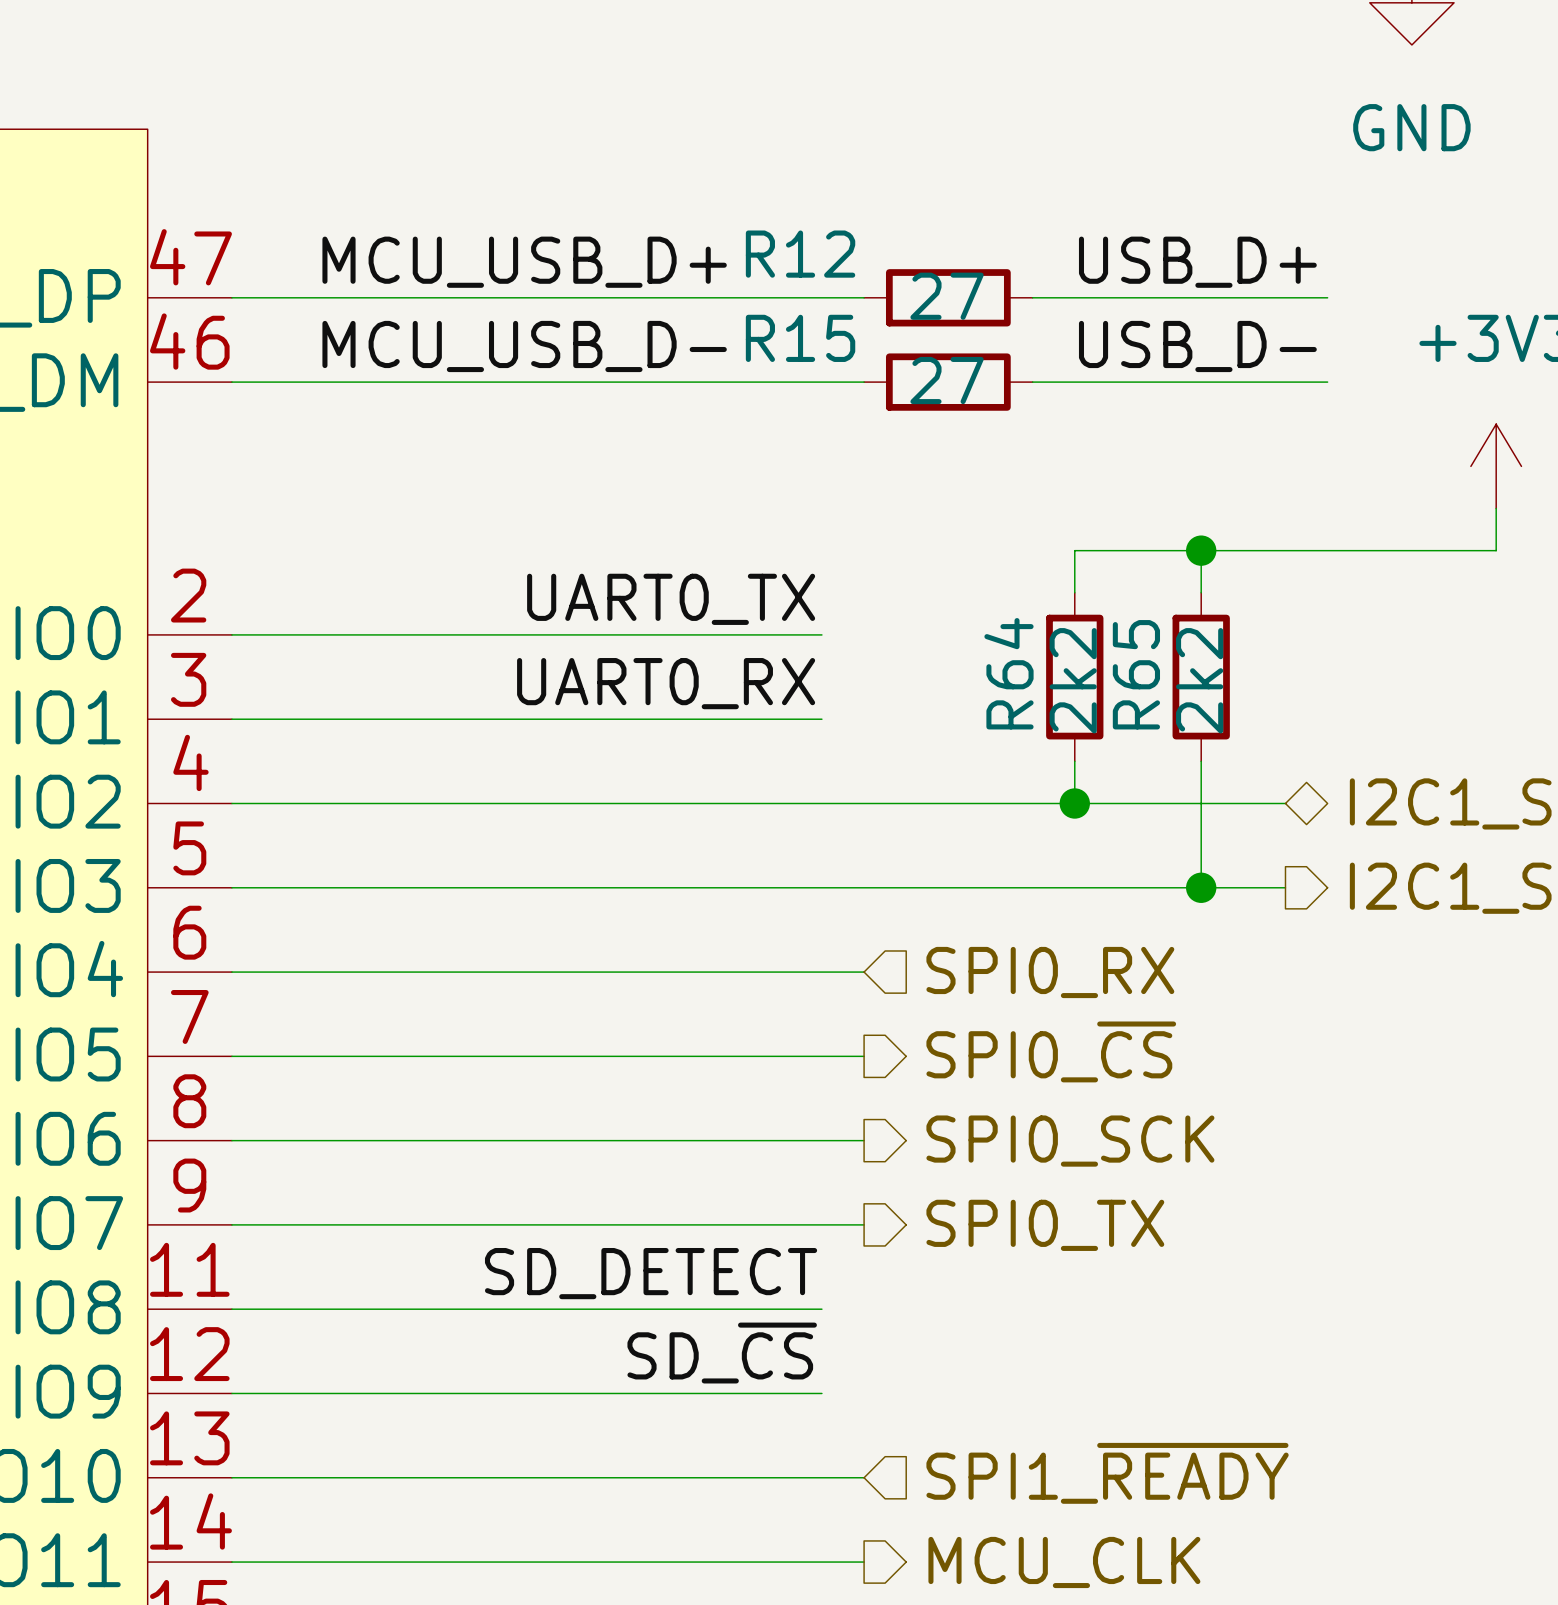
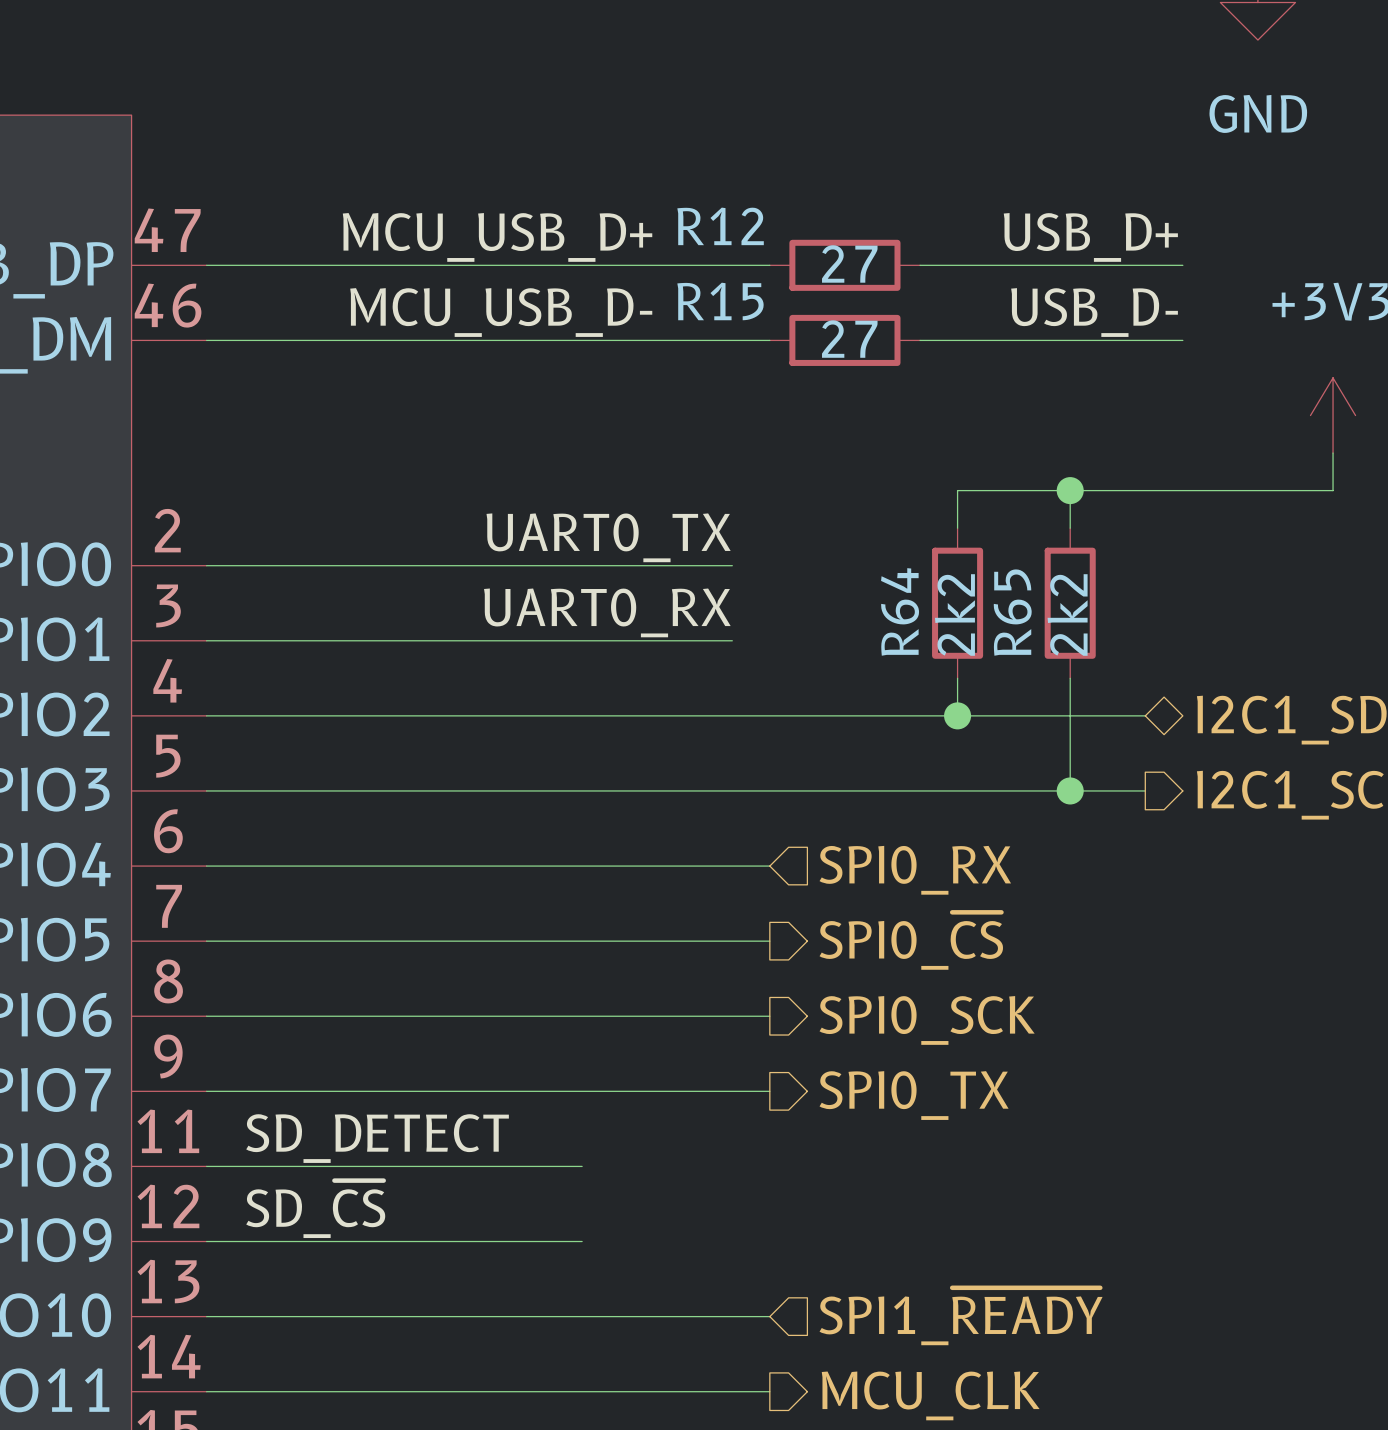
label position: SD_DETECT (651, 1273) -> SD_DETECT (377, 1138)
wire: (653, 1309) (821, 1309) -> none
label position: SD_~{CS} (722, 1353) -> SD_~{CS} (315, 1209)
wire: (653, 1393) (821, 1393) -> none

